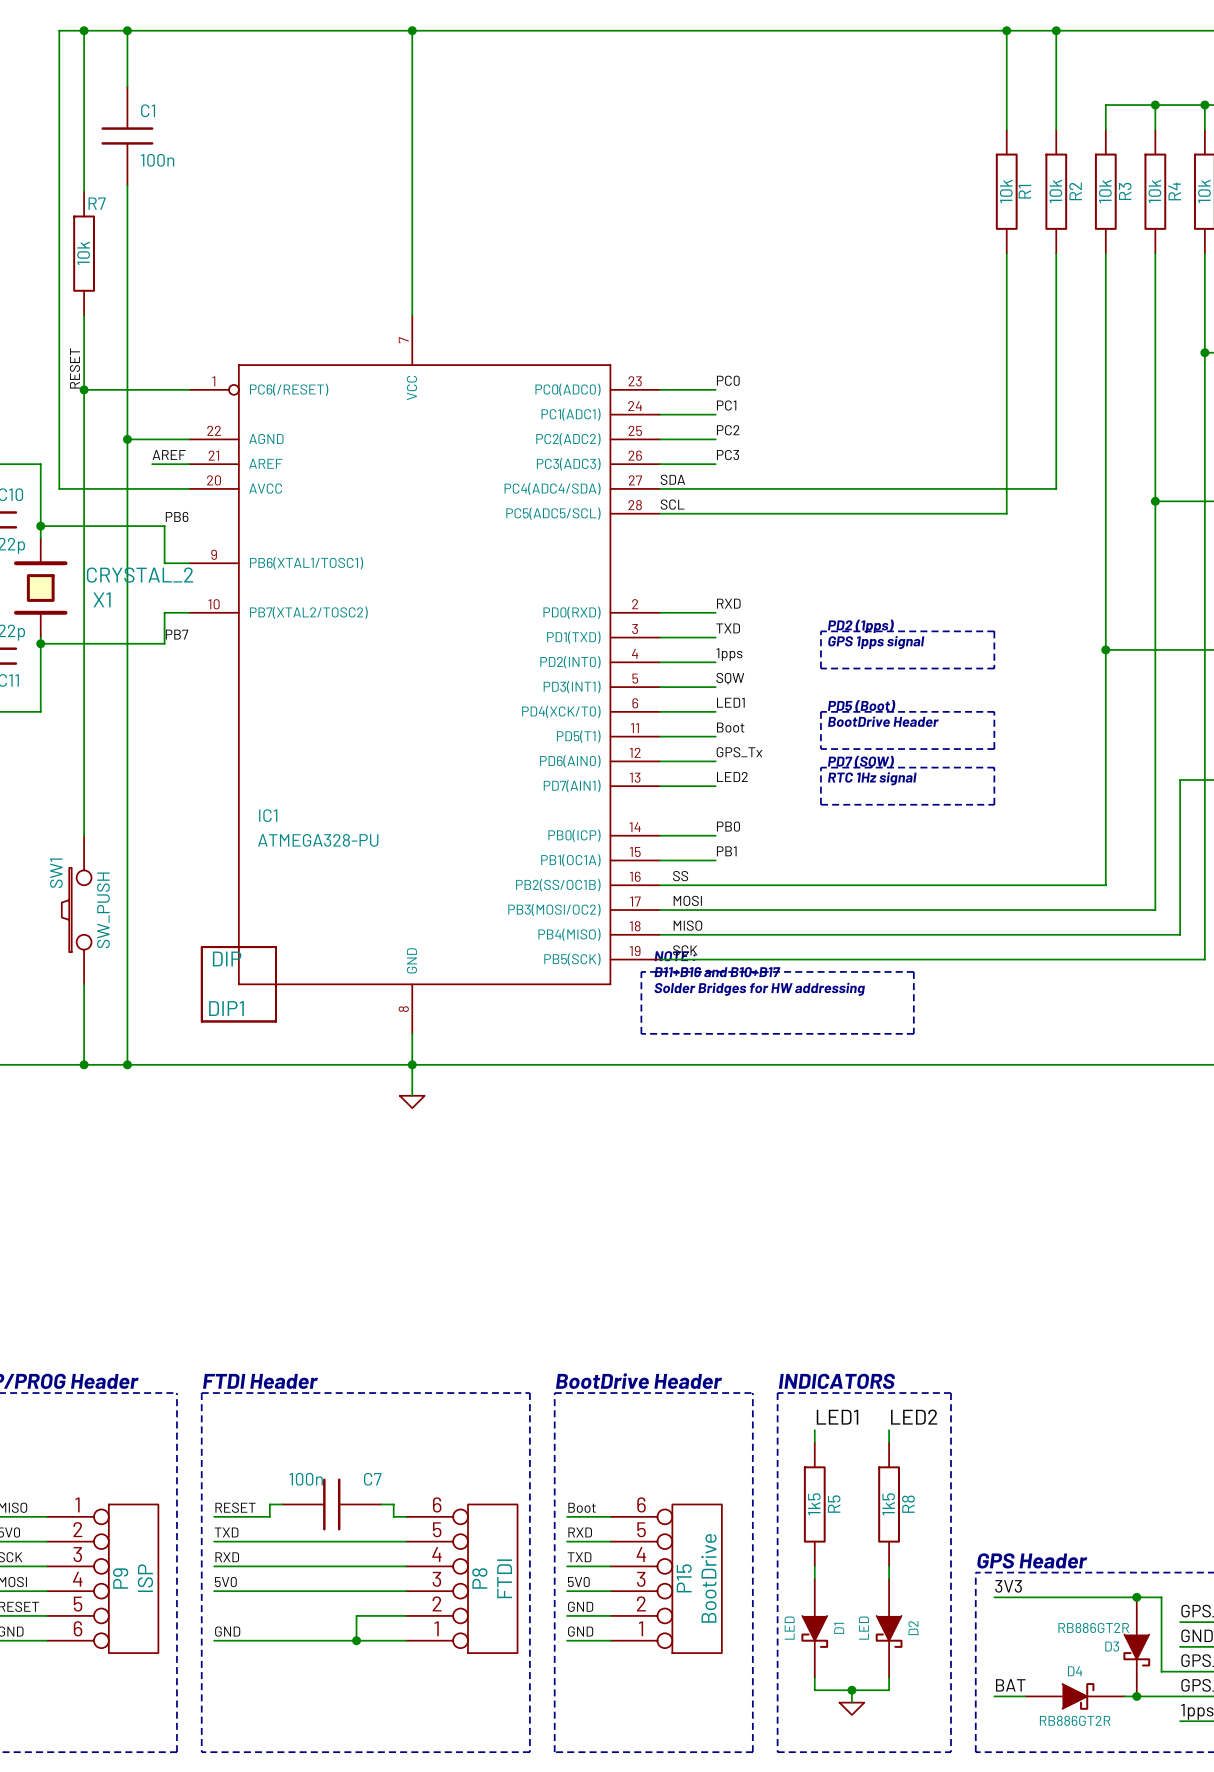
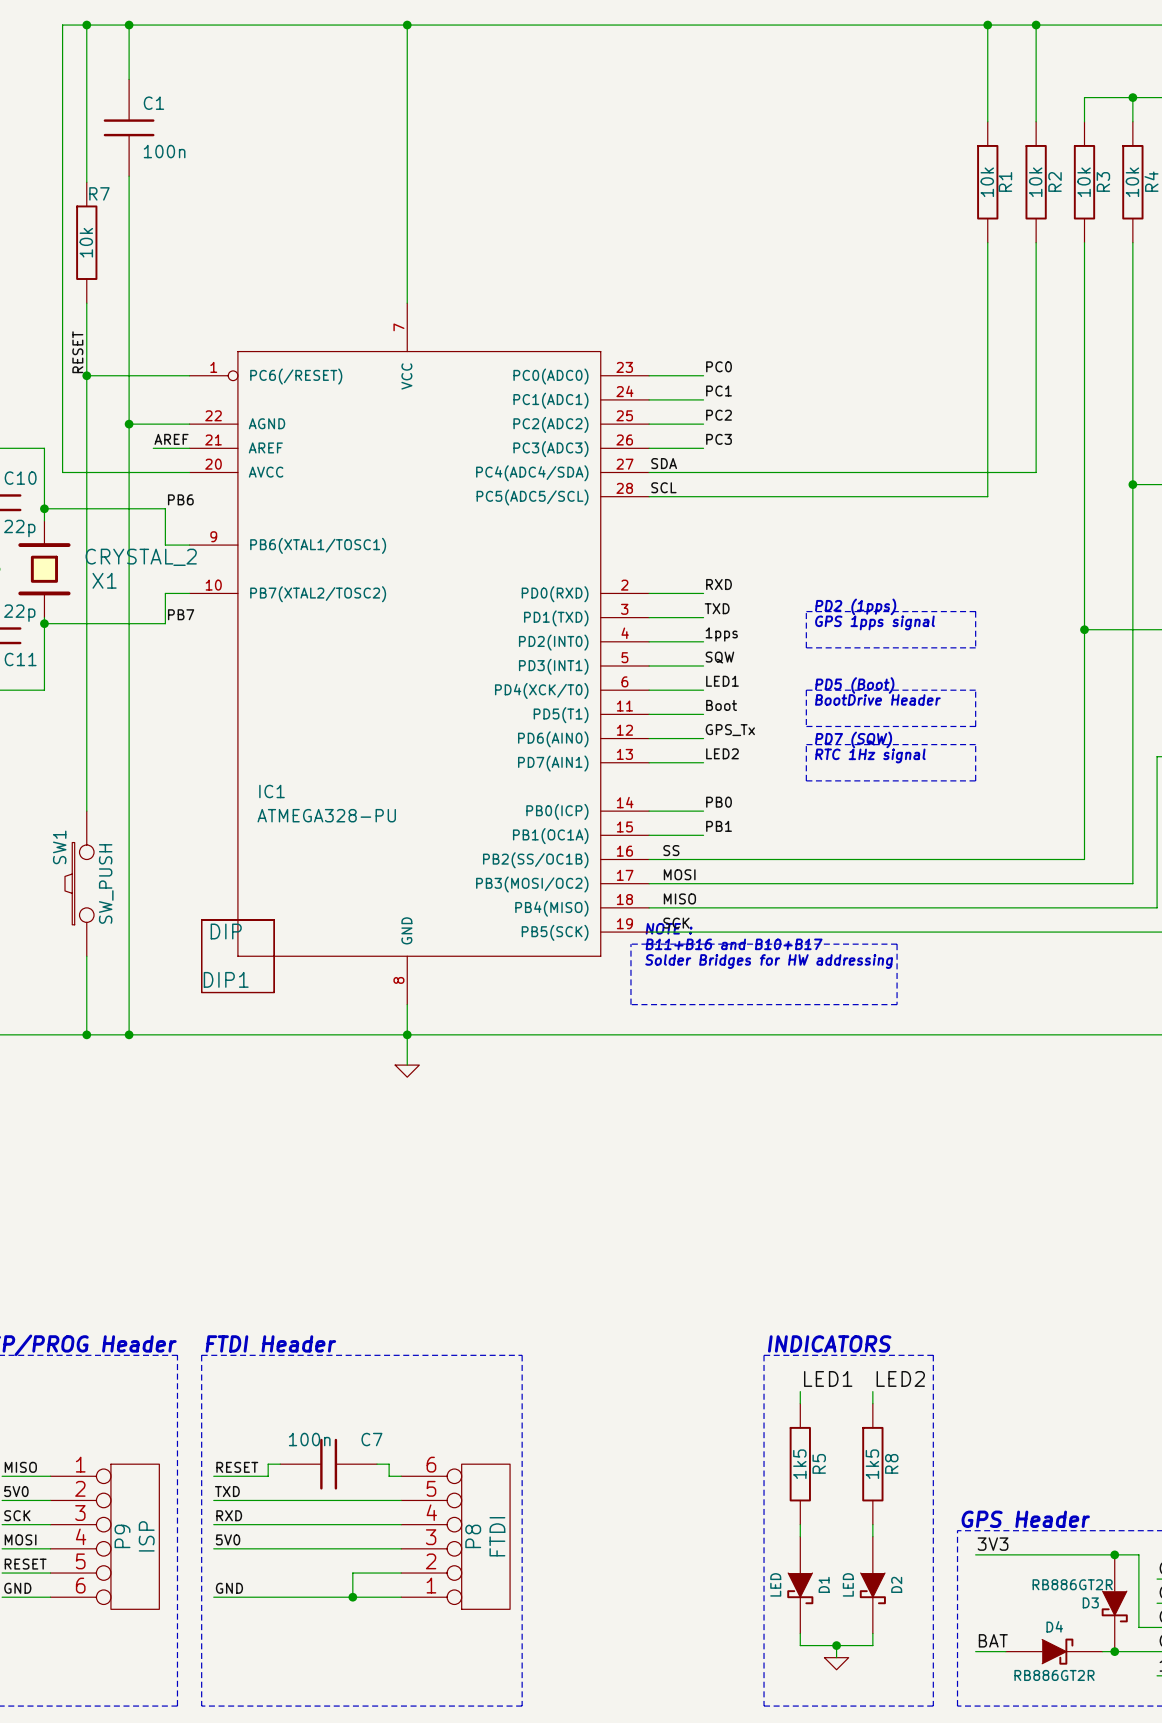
text: BootDrive Header (639, 1381) -> none
line: (554, 1393) (554, 1752) (752, 1752) (752, 1393) (554, 1393) -> none
label: Boot (582, 1507) -> none
wire: (567, 1516) (610, 1516) -> none
label: RXD (580, 1532) -> none
wire: (567, 1541) (610, 1541) -> none
label: TXD (579, 1557) -> none
wire: (567, 1566) (610, 1566) -> none
P15: BootDrive (666, 1578) -> none
label: 5V0 (578, 1582) -> none
wire: (567, 1591) (610, 1591) -> none
label: GND (580, 1606) -> none
wire: (567, 1615) (610, 1615) -> none
label: GND (580, 1631) -> none
wire: (567, 1640) (610, 1640) -> none

